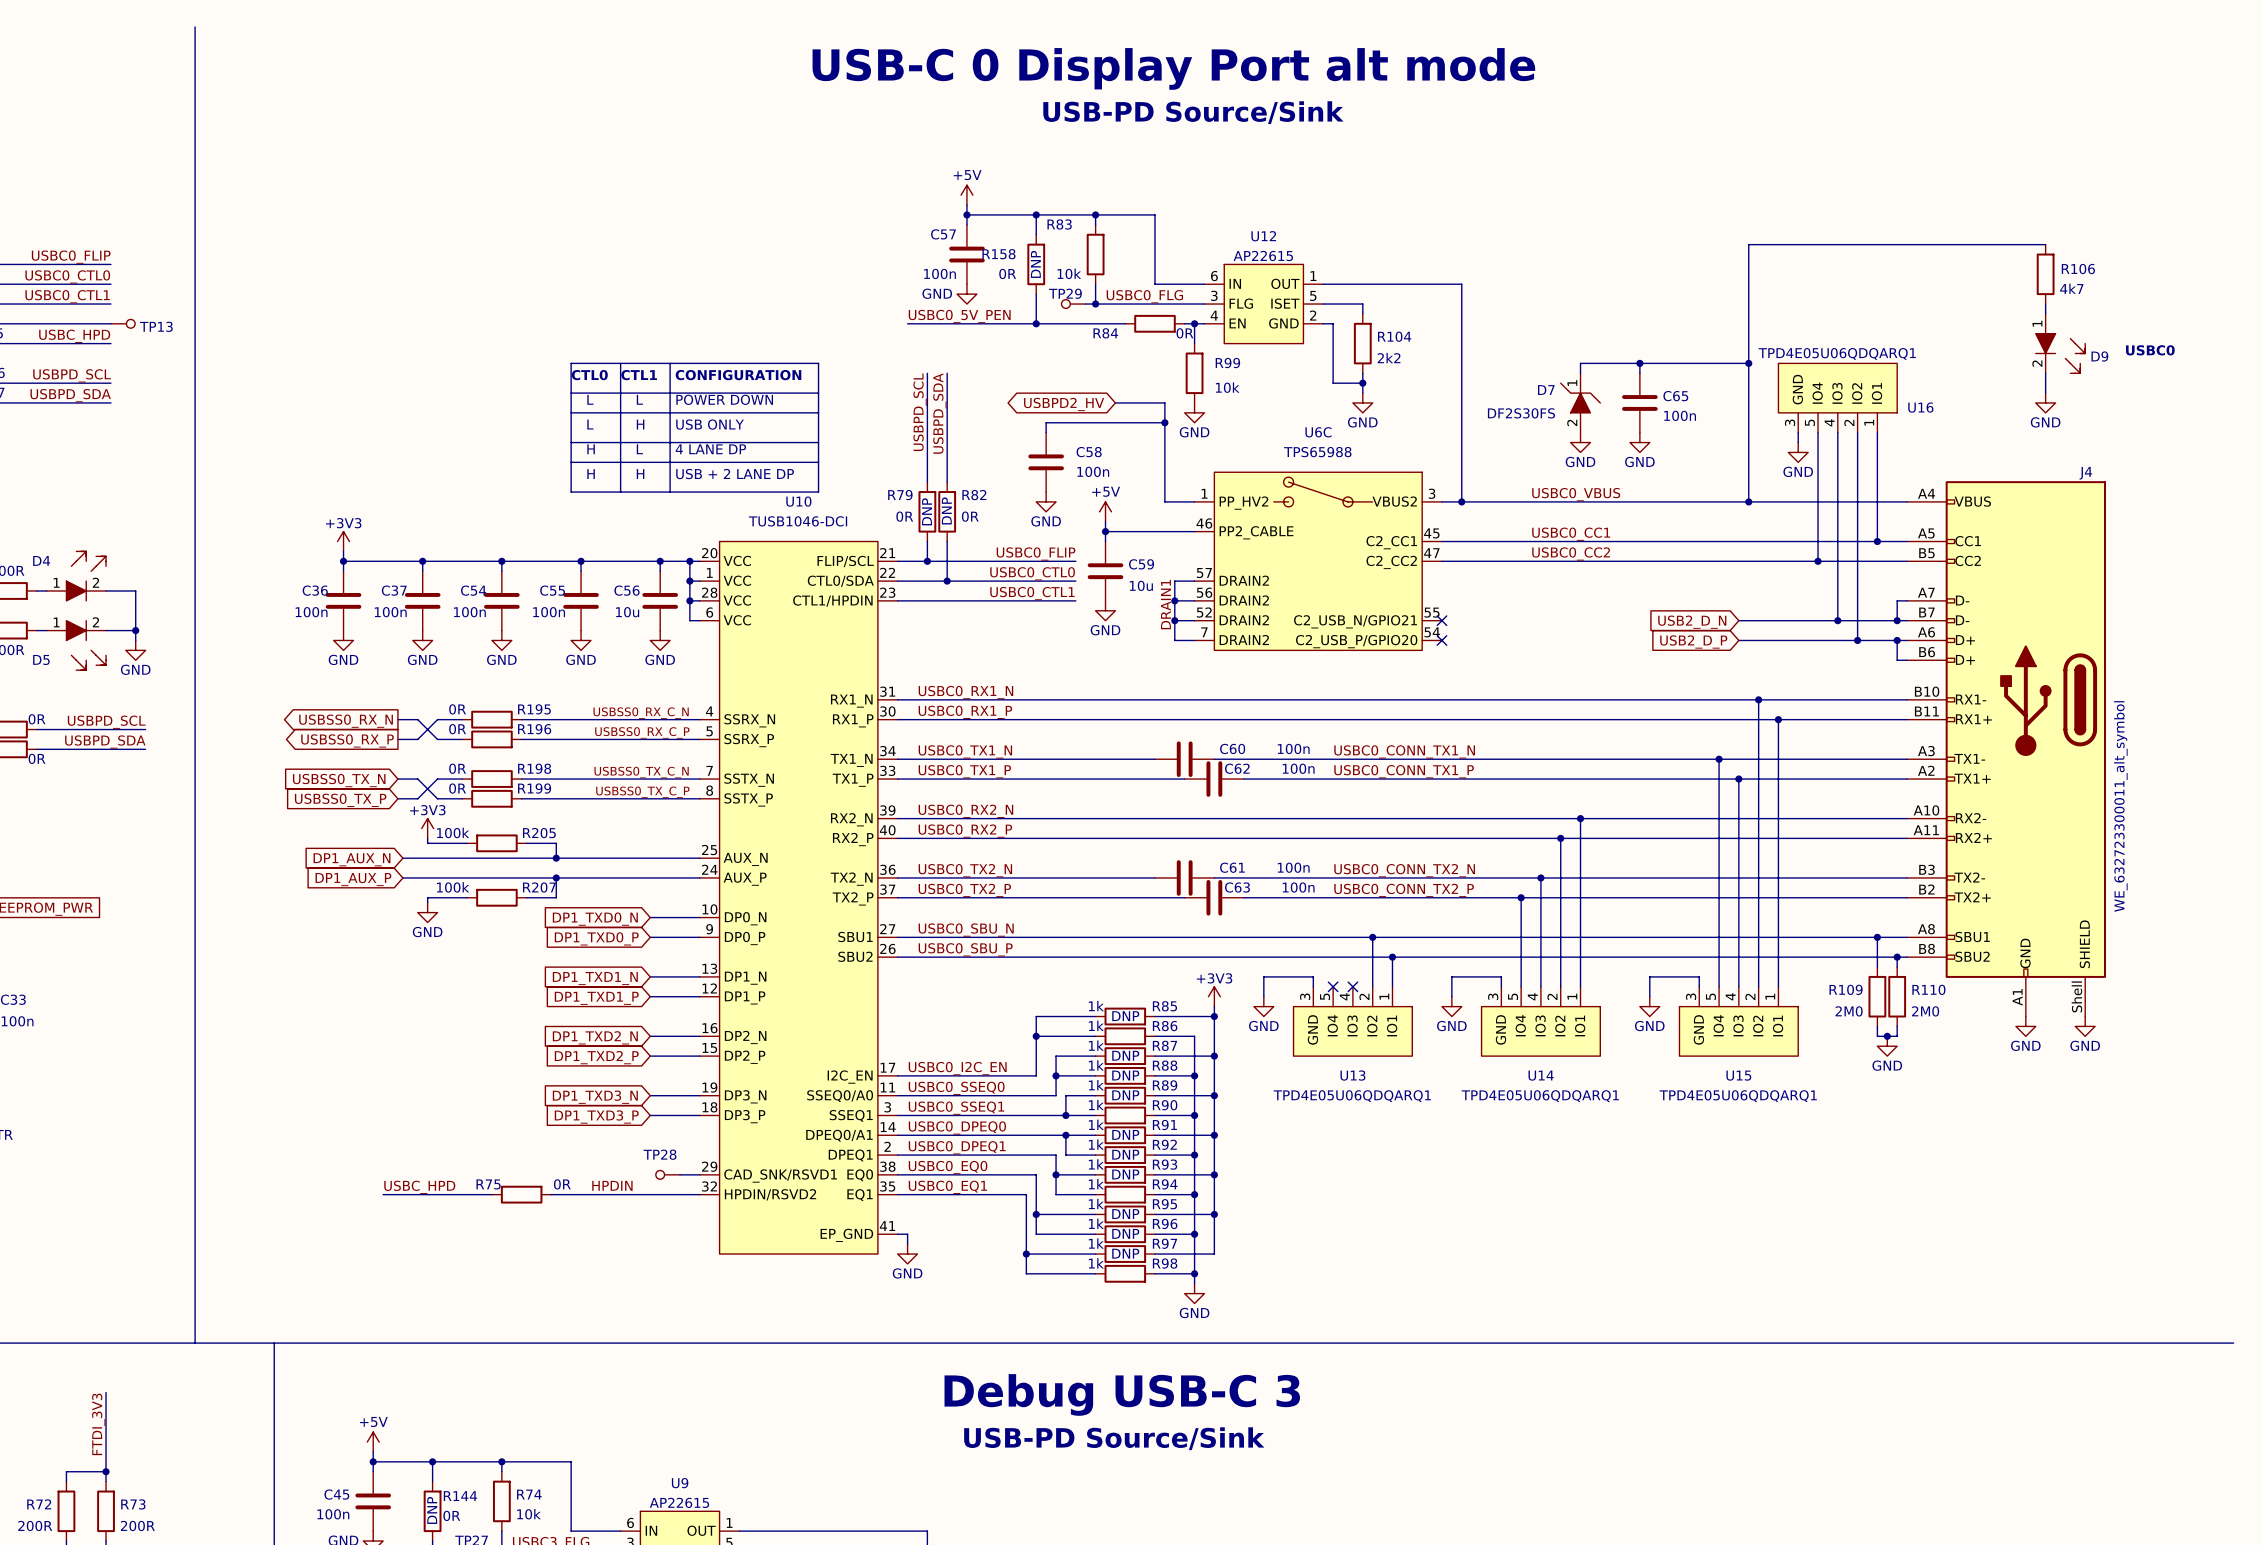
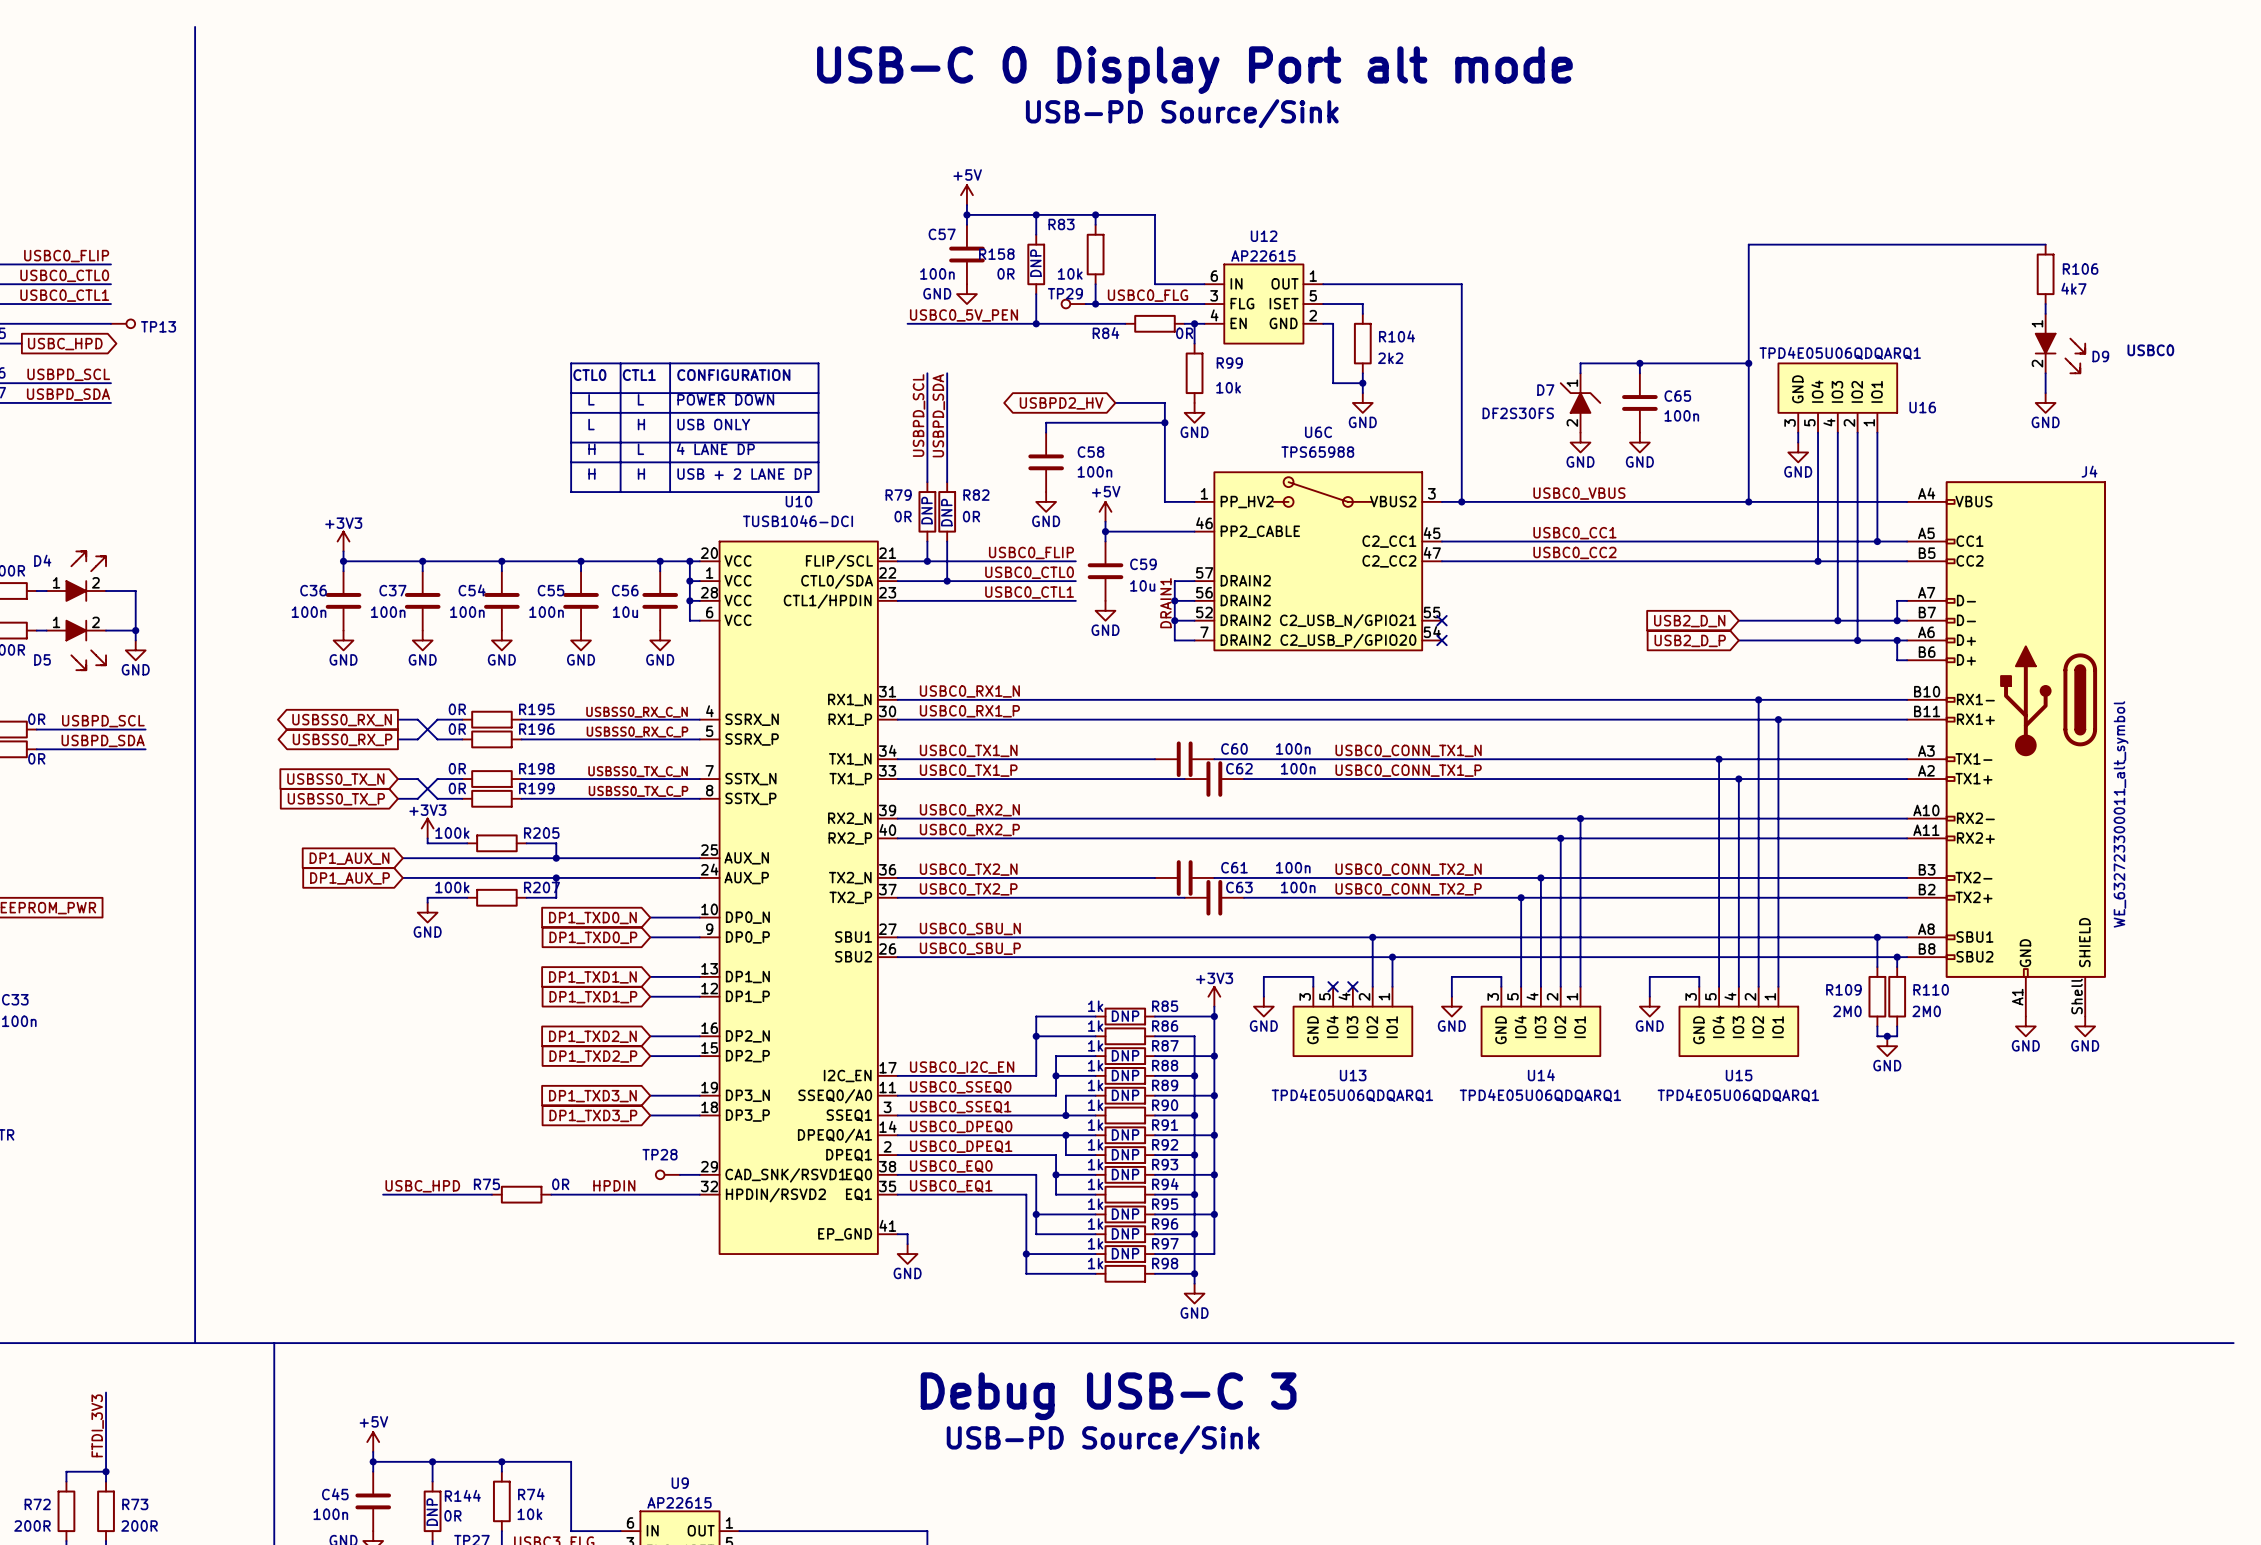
label: USBC_HPD (74, 336) -> none
wire: (21, 343) (110, 343) -> none
global label: none -> USBC_HPD (65, 344)

